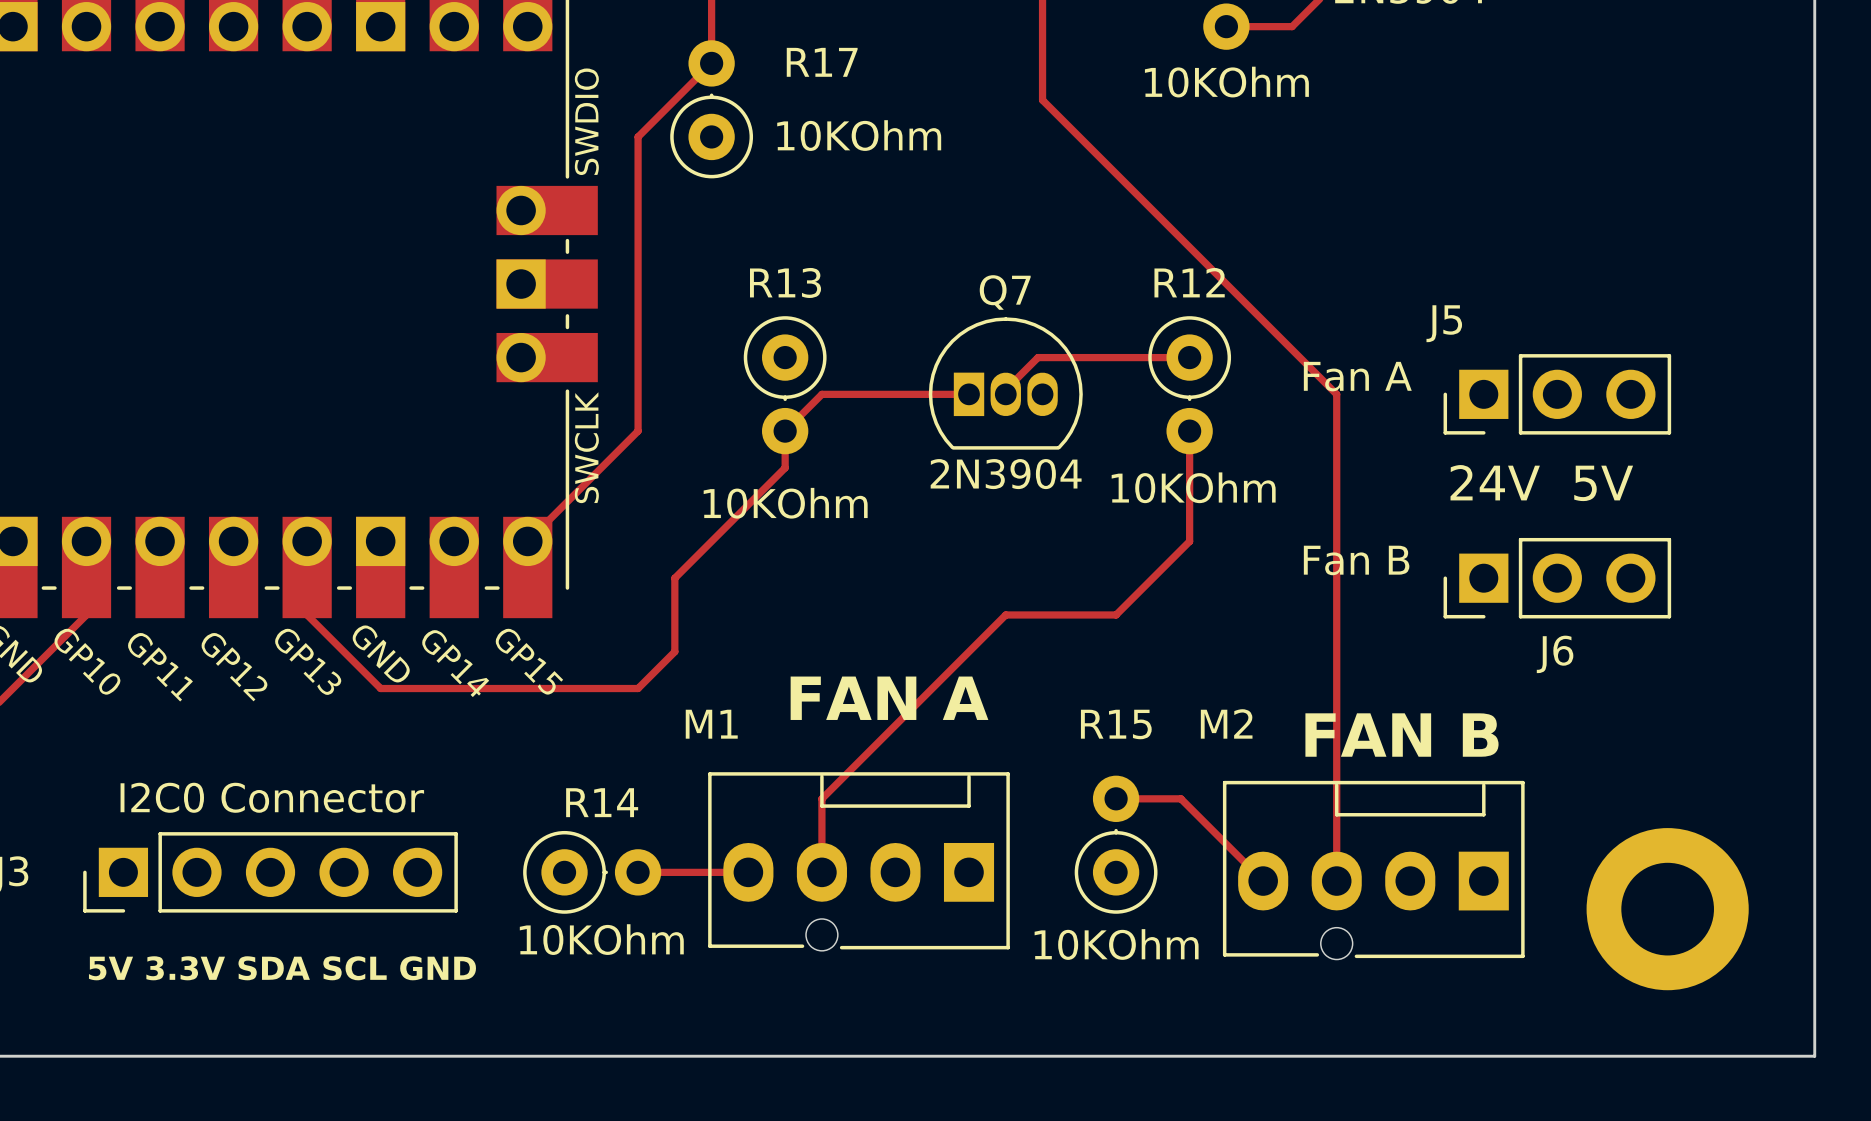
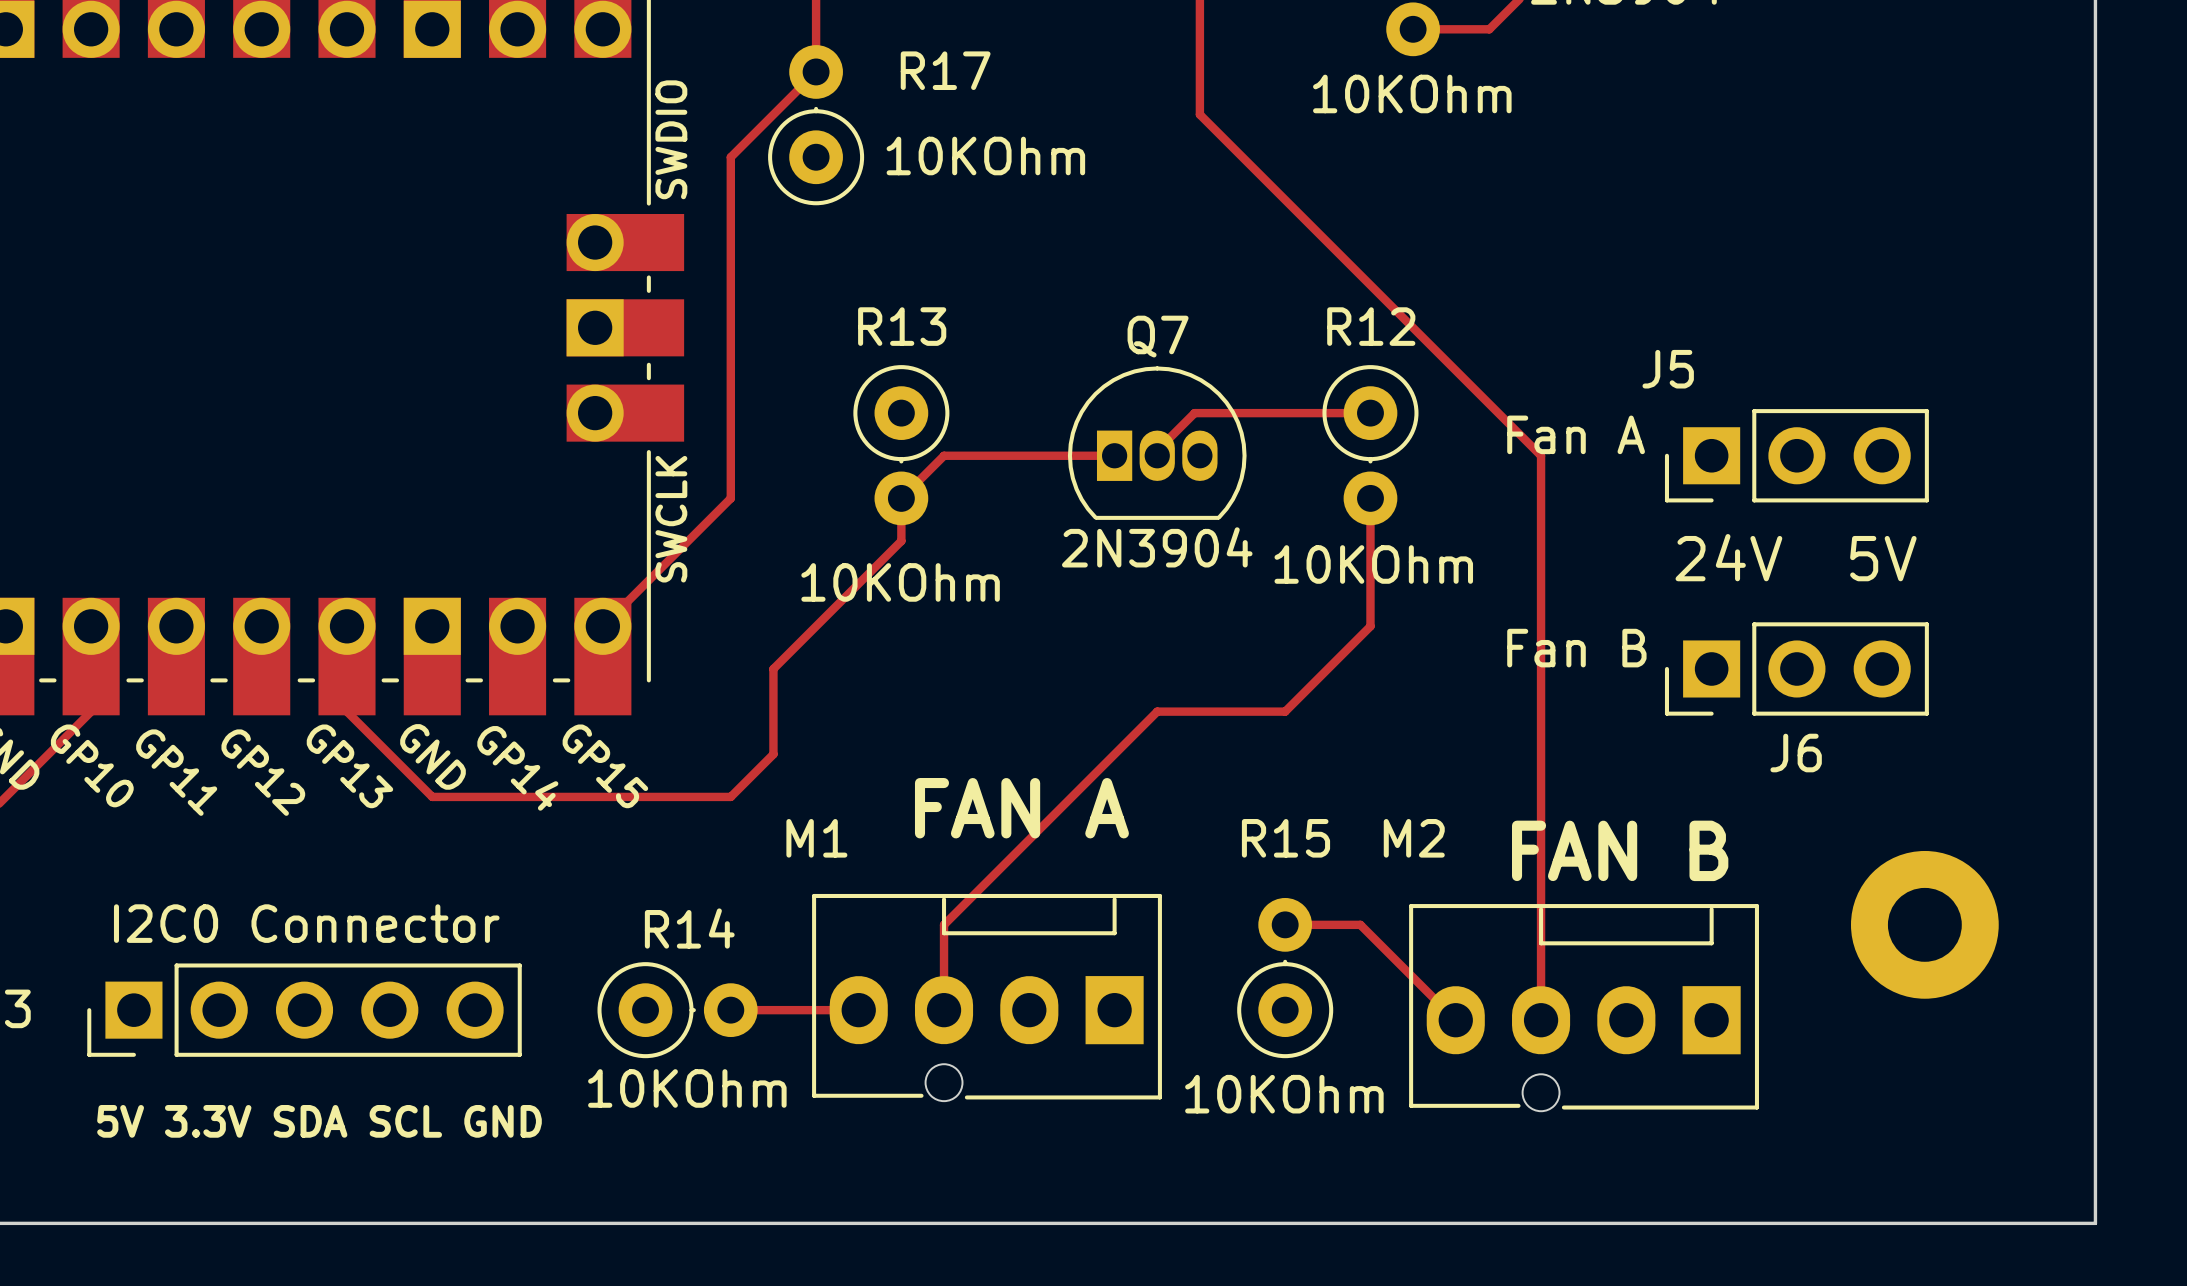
part: none -> (1924, 924)
part: (1667, 909) -> none

